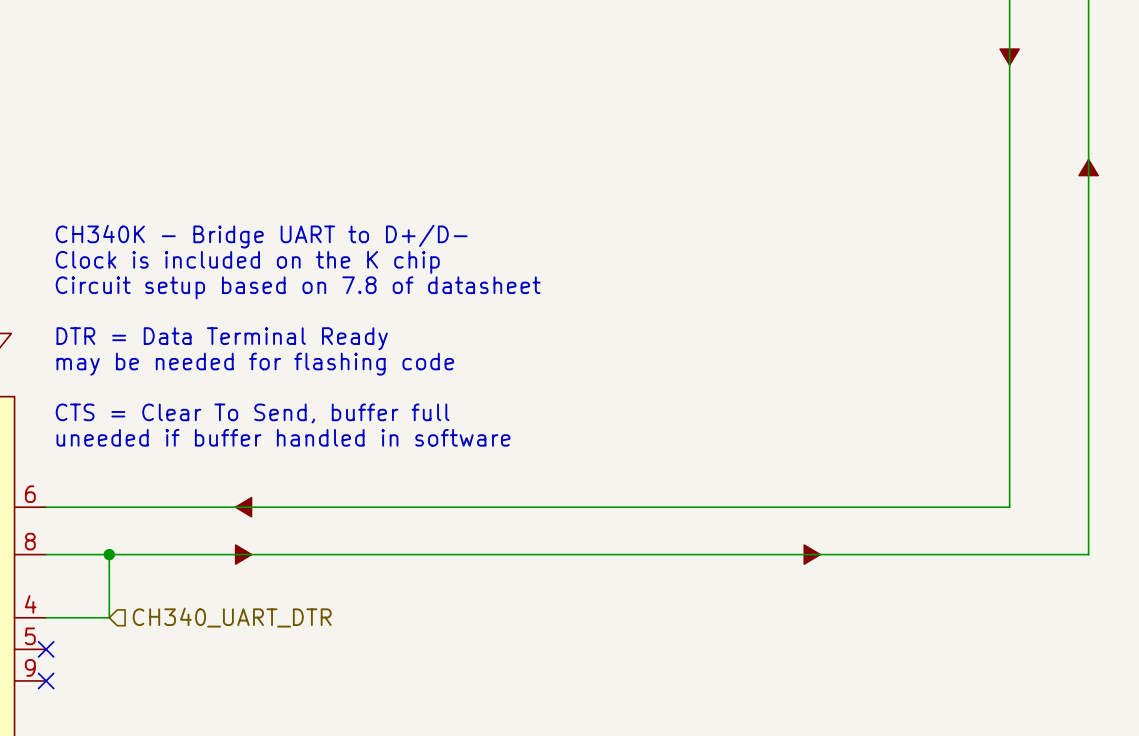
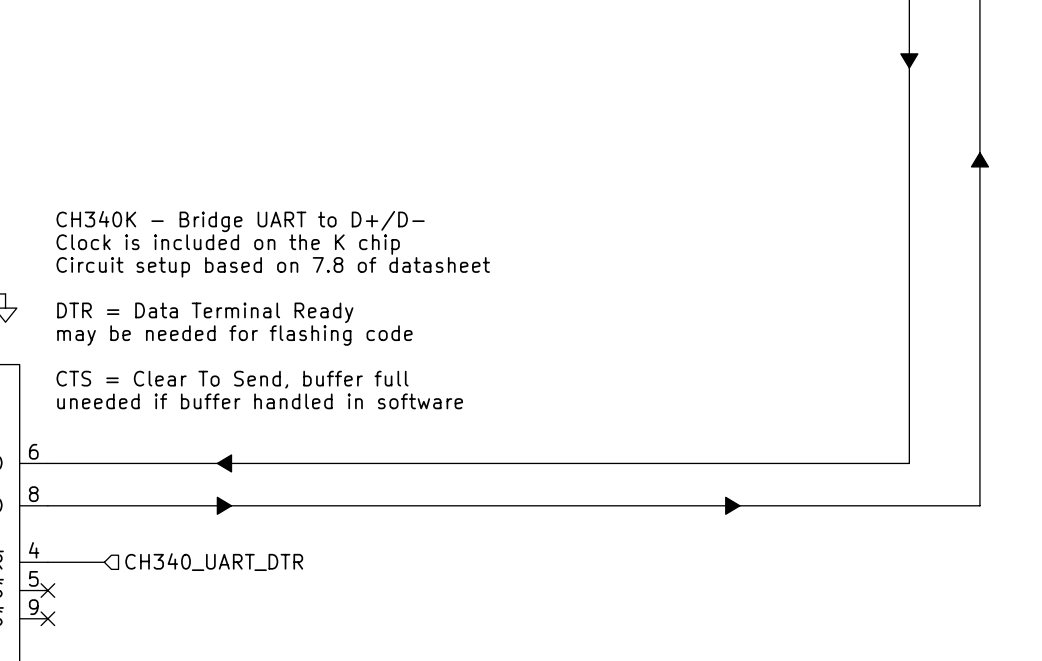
wire: (109, 554) (109, 617) -> none
junction: (109, 554) -> none

